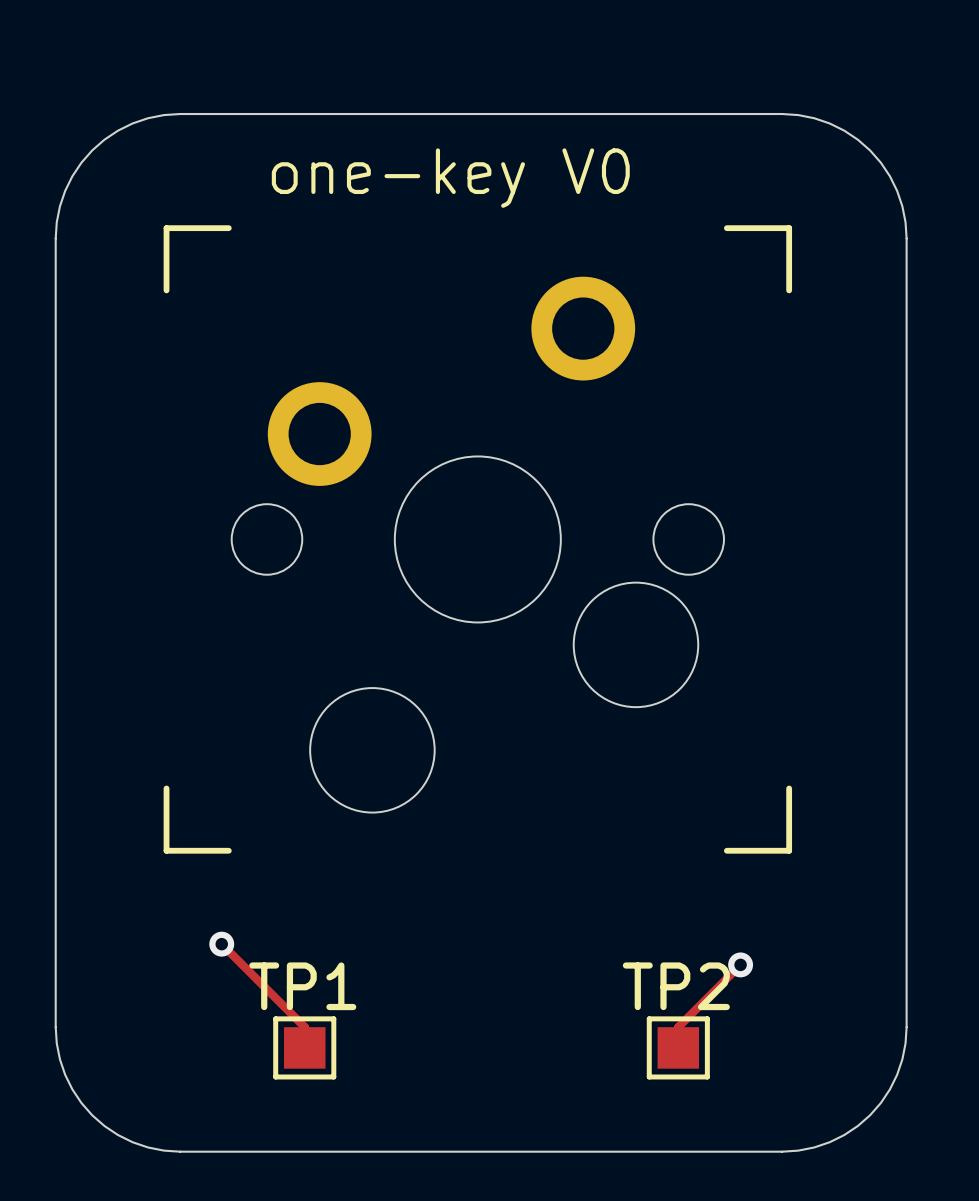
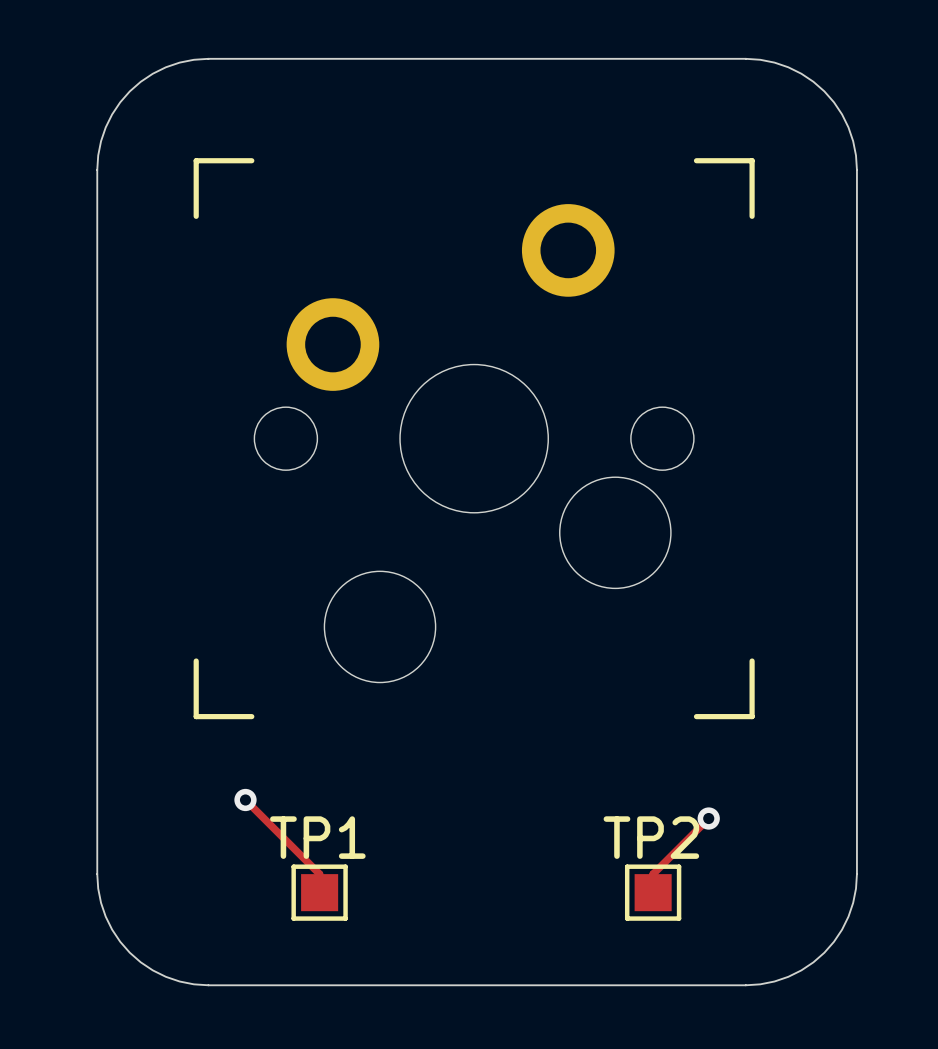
text: one-key V0 (450, 178) -> none

